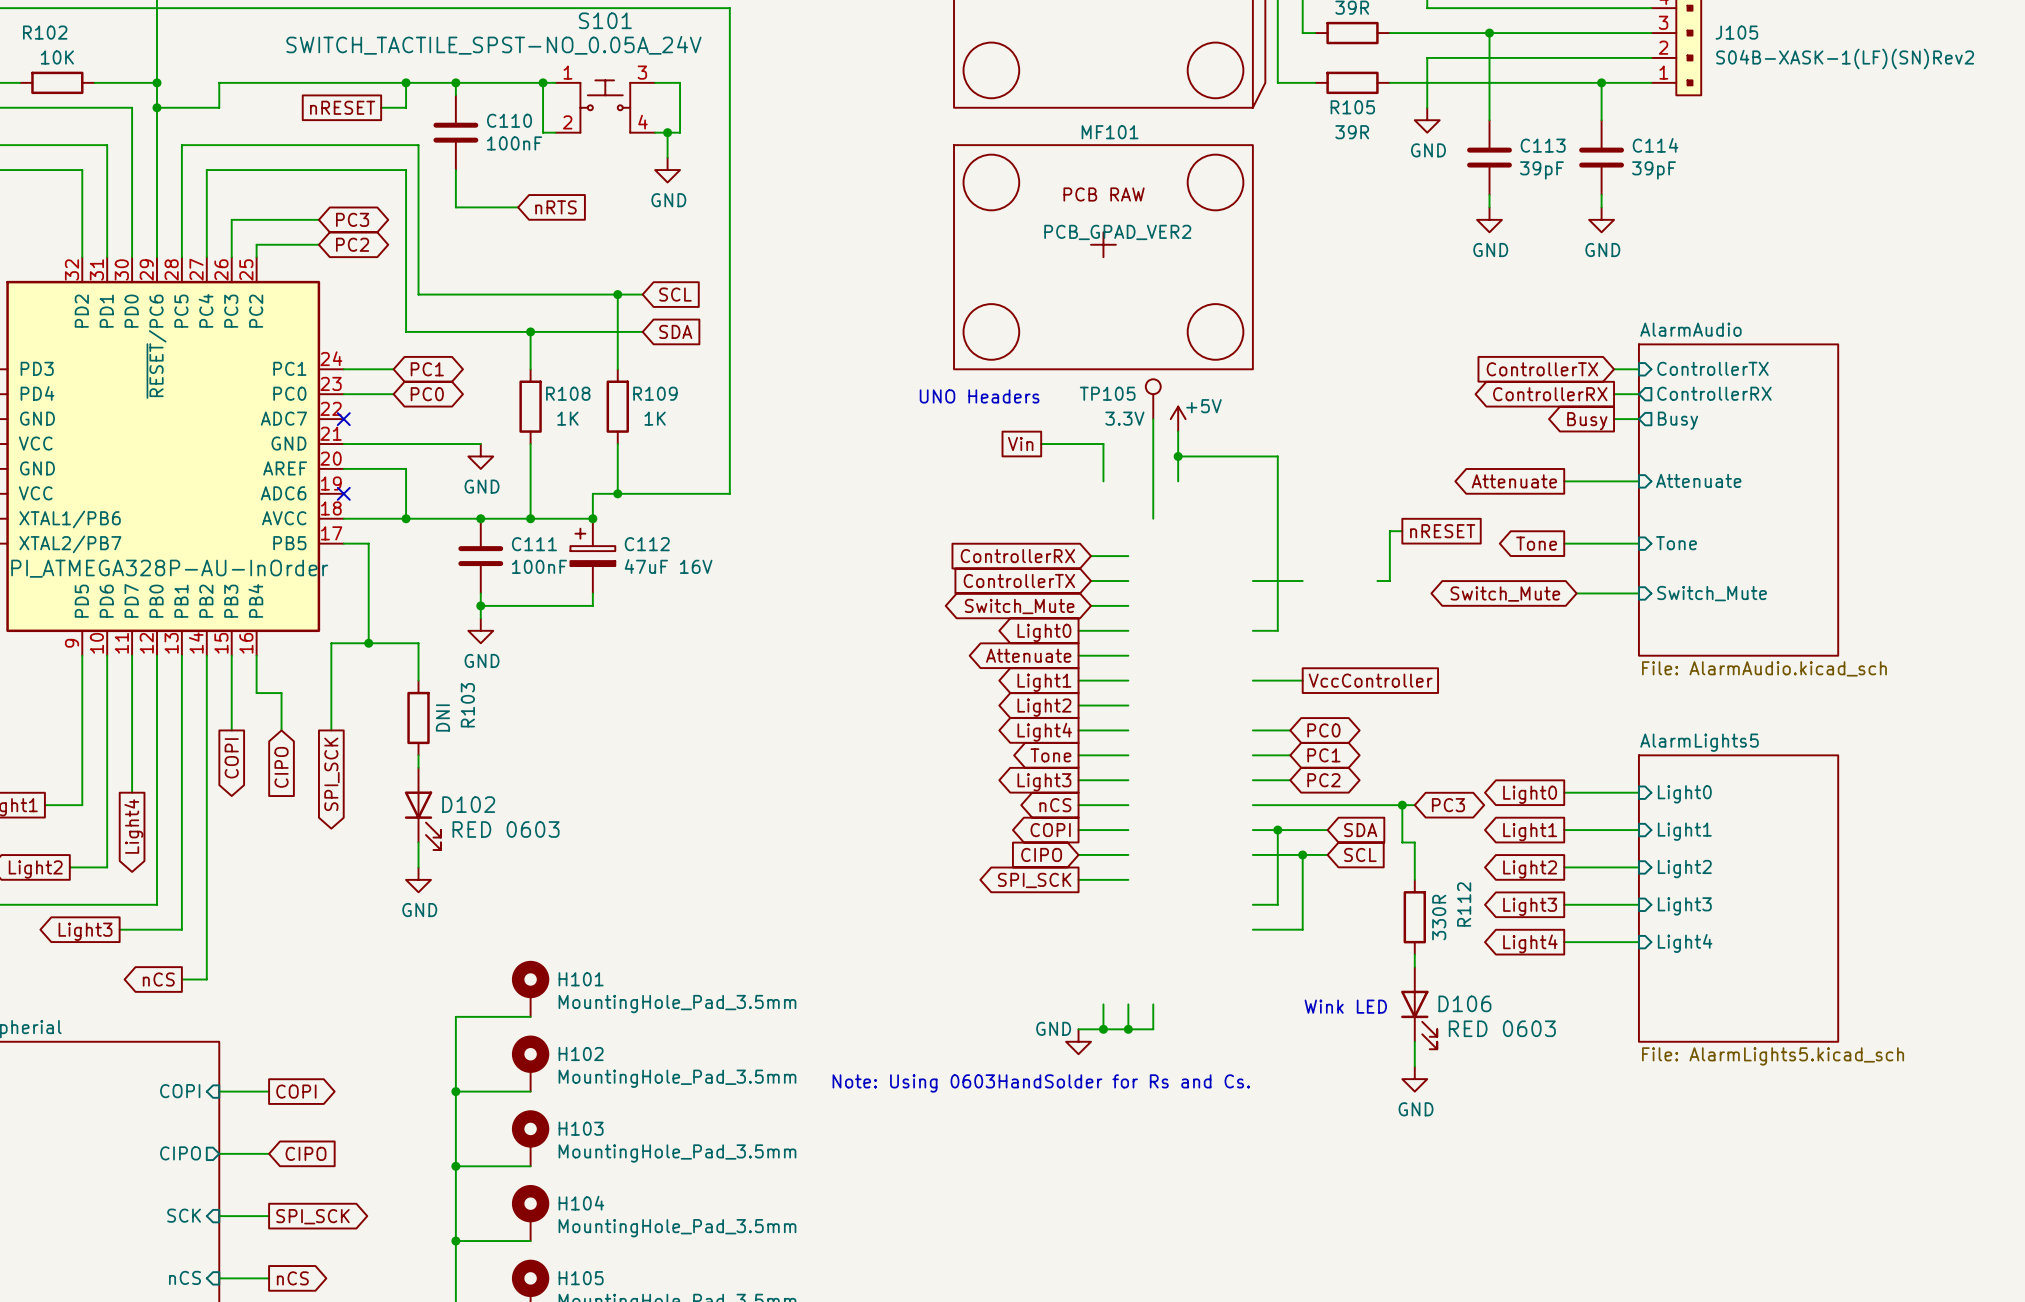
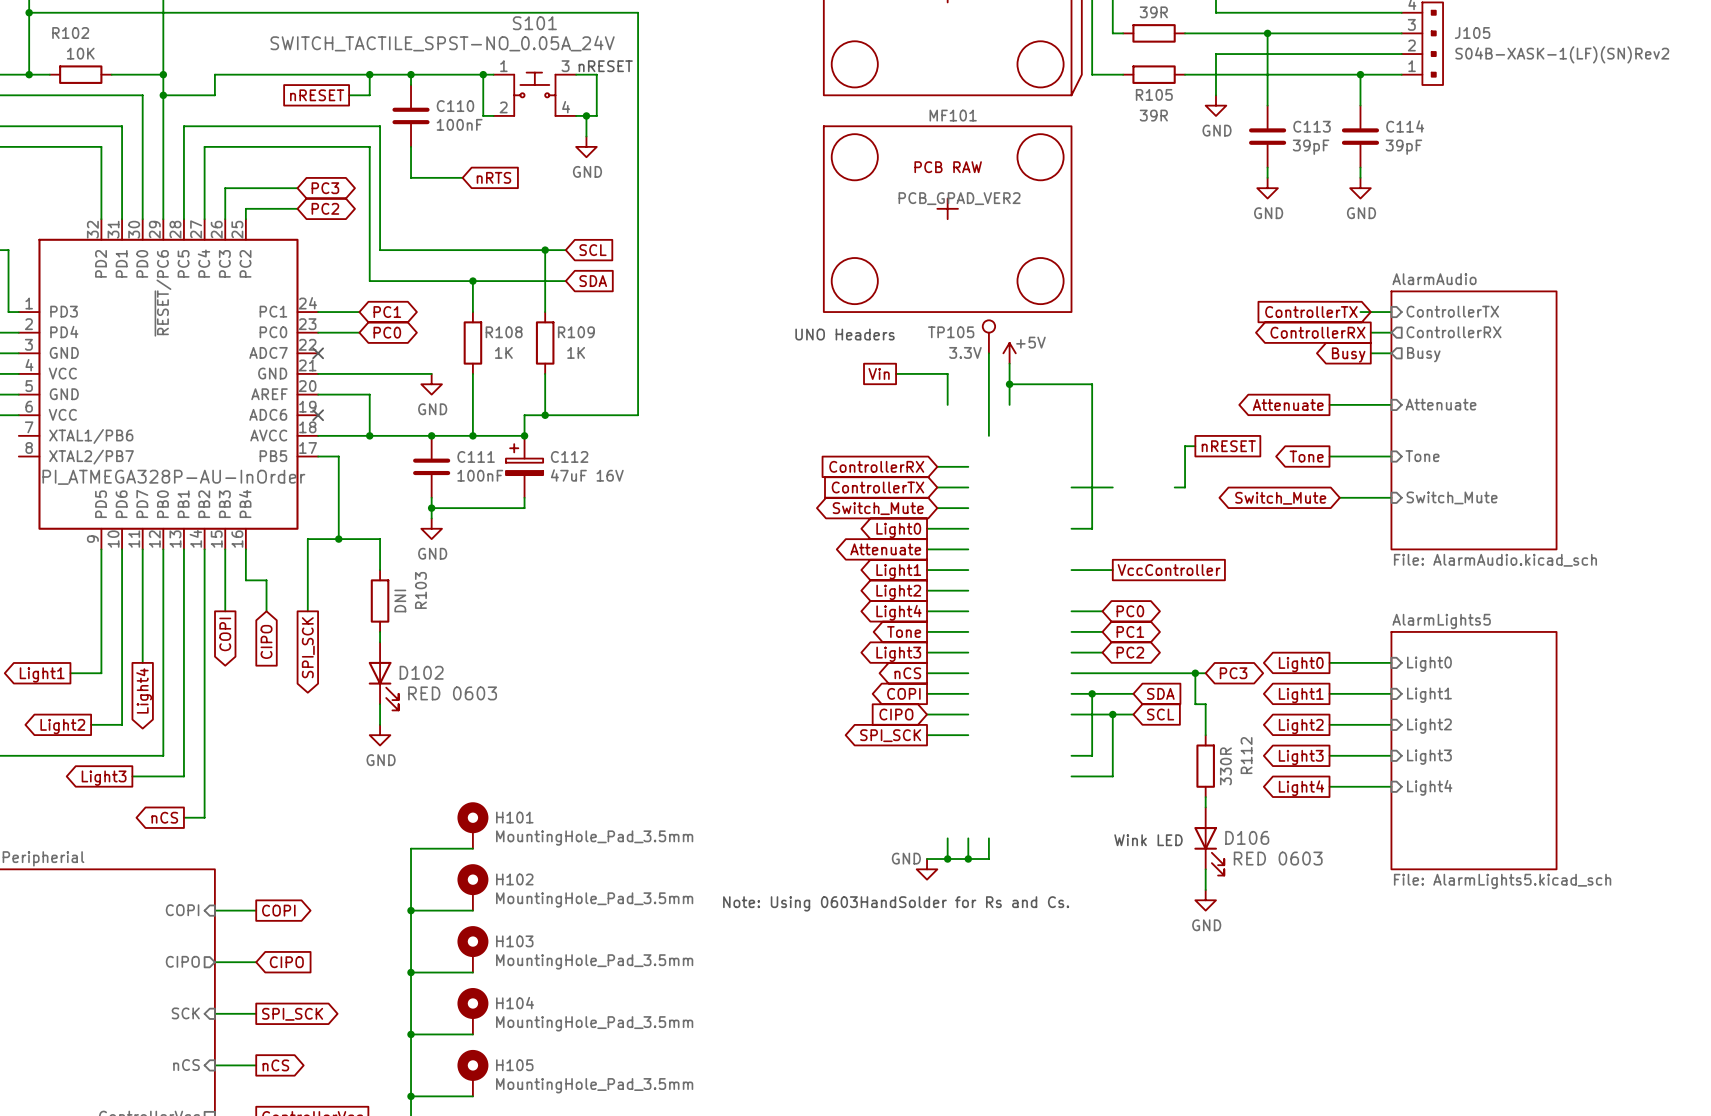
text: none -> nRESET (605, 66)
wire: none -> (1360, 312) (1370, 312)

